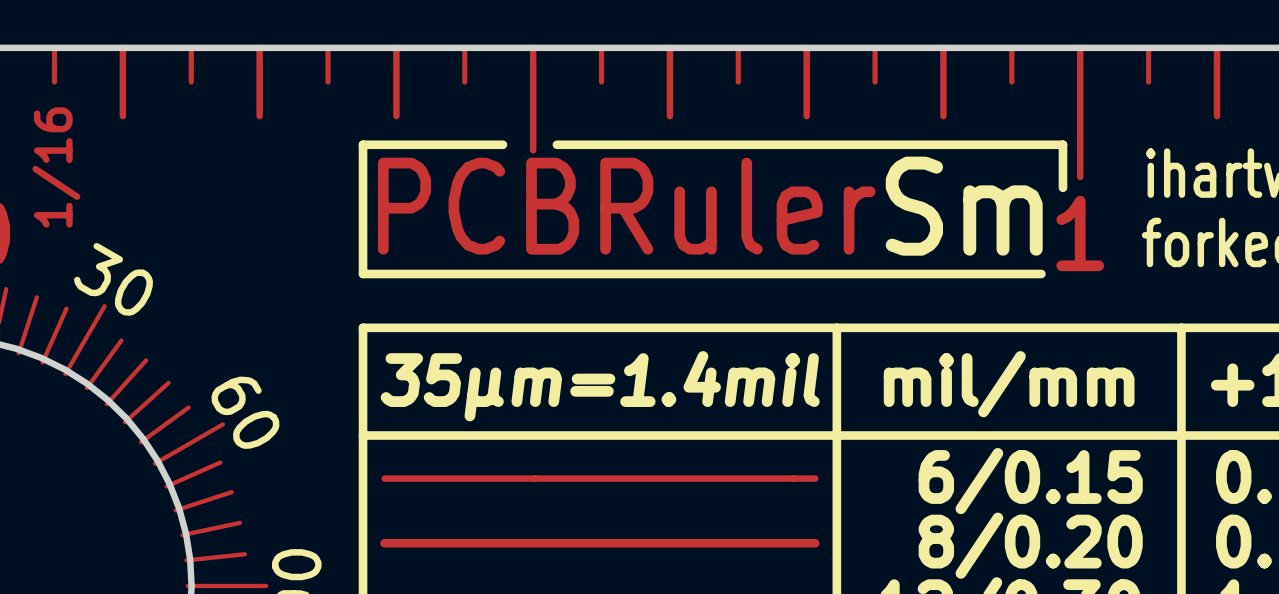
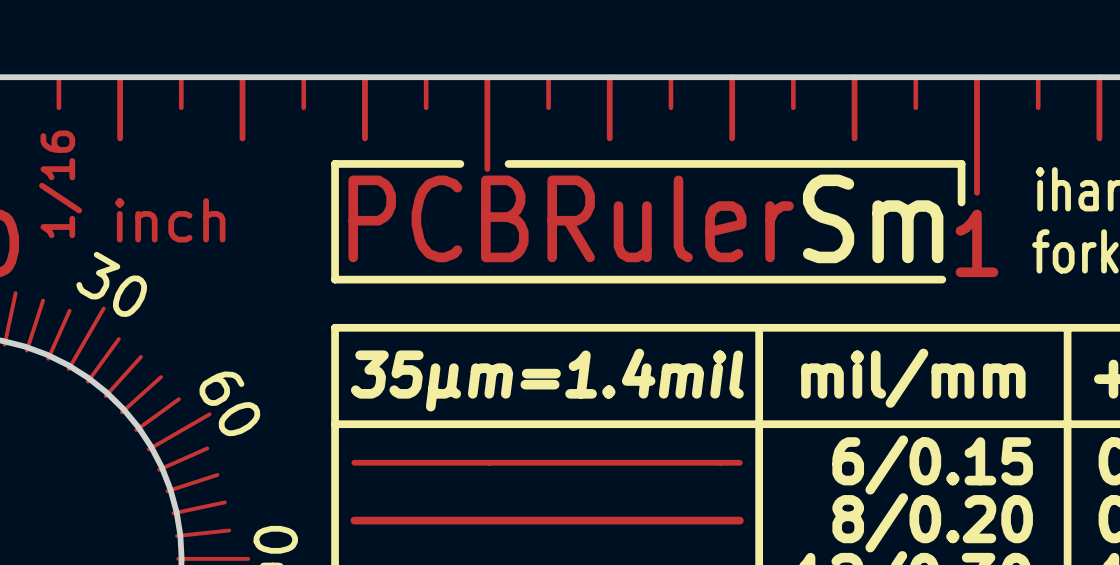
text: none -> inch (170, 220)

